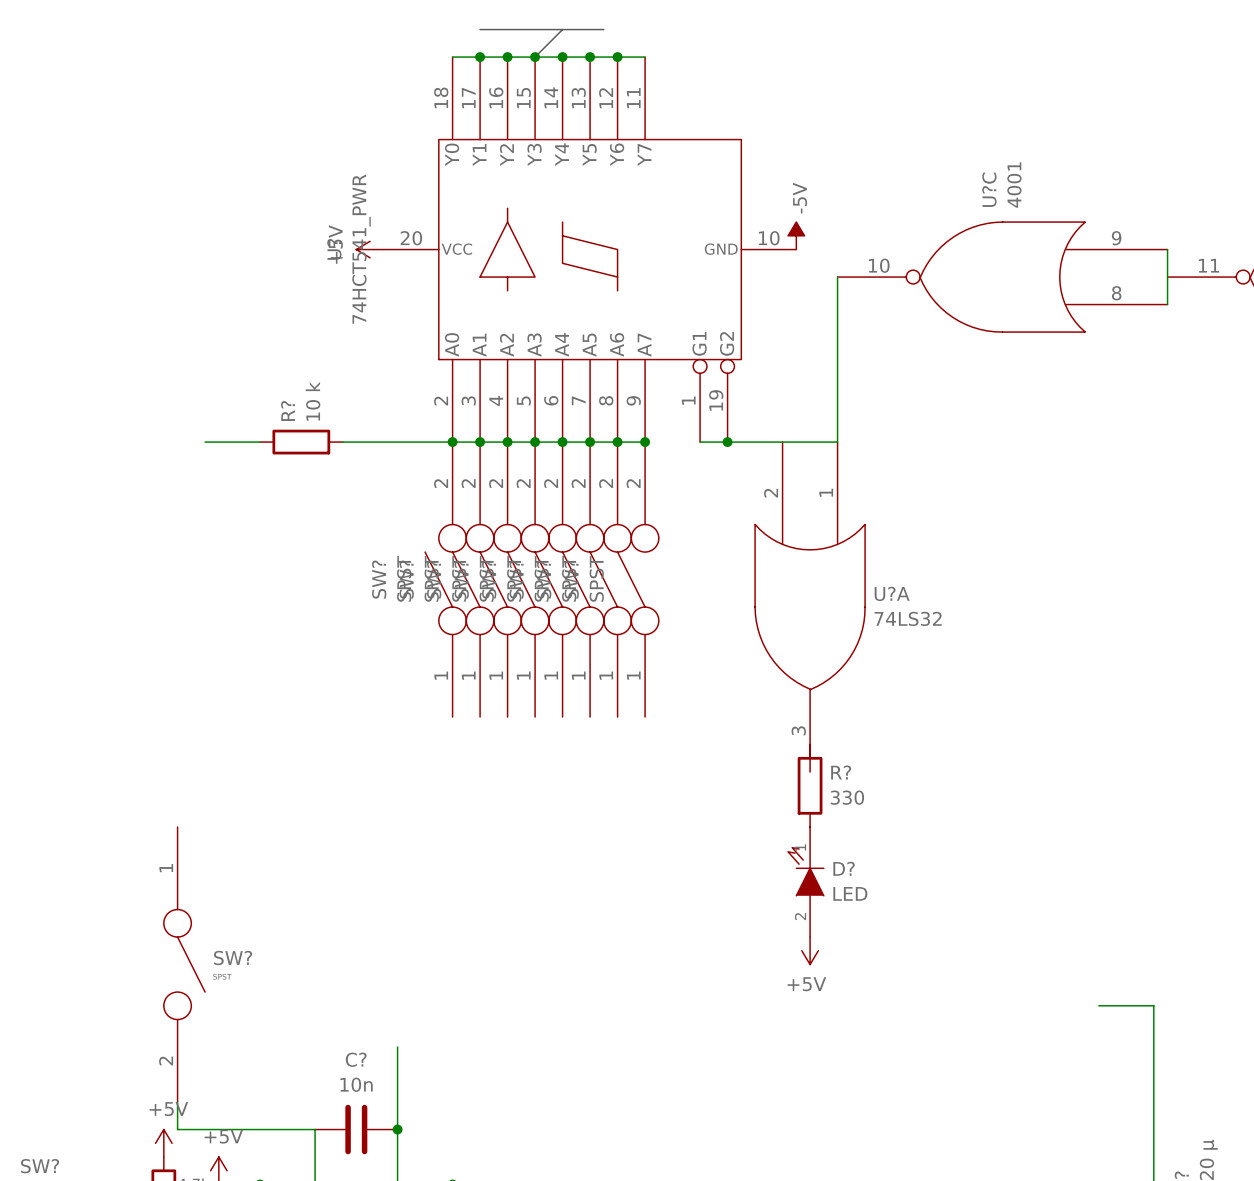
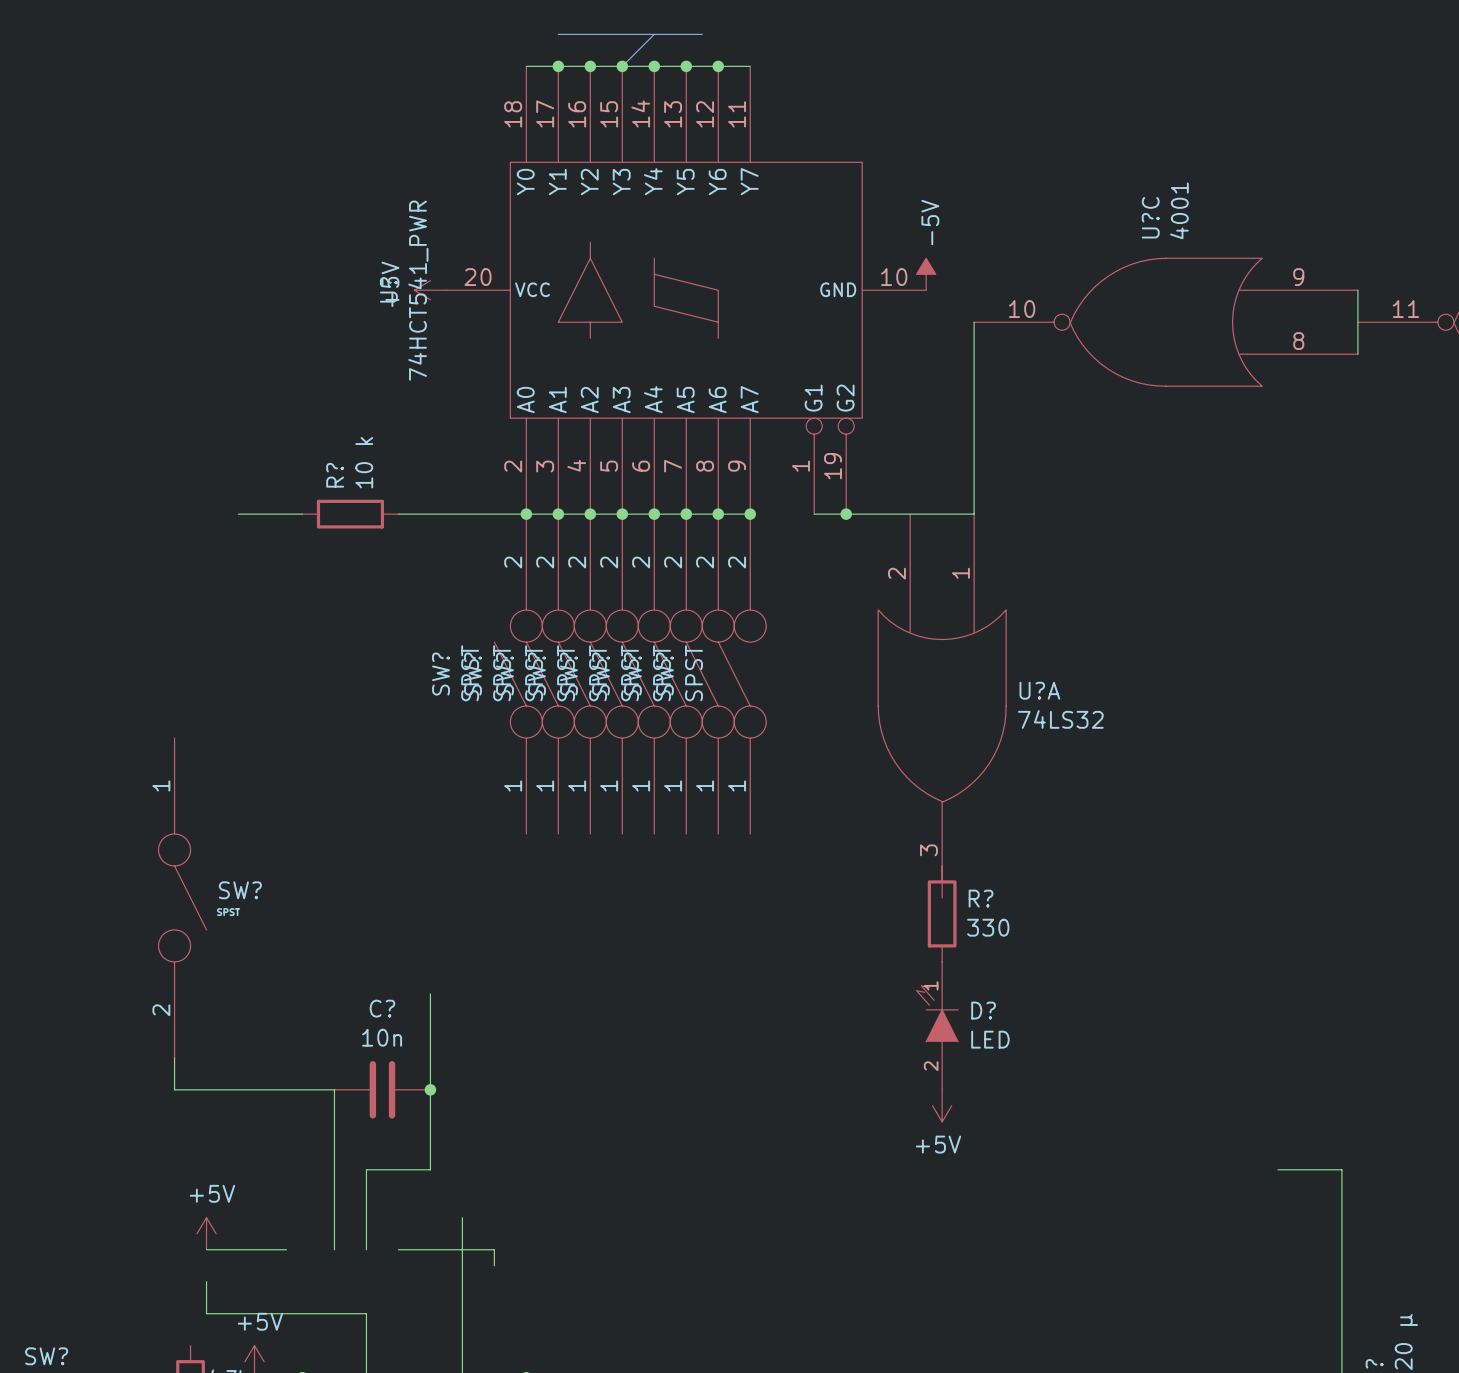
wire: none -> (430, 993) (430, 1169) (366, 1169) (366, 1249)
wire: none -> (174, 1057) (174, 1089) (334, 1089) (334, 1249)
junction: none -> (430, 1089)
SW? position: (184, 964) -> (182, 897)
wire: none -> (206, 1249) (286, 1249)
wire: none -> (398, 1249) (494, 1249) (494, 1265)
C? position: (356, 1129) -> (382, 1089)
junction: (397, 1129) -> none
power symbol position: +5V (163, 1143) -> +5V (206, 1233)

